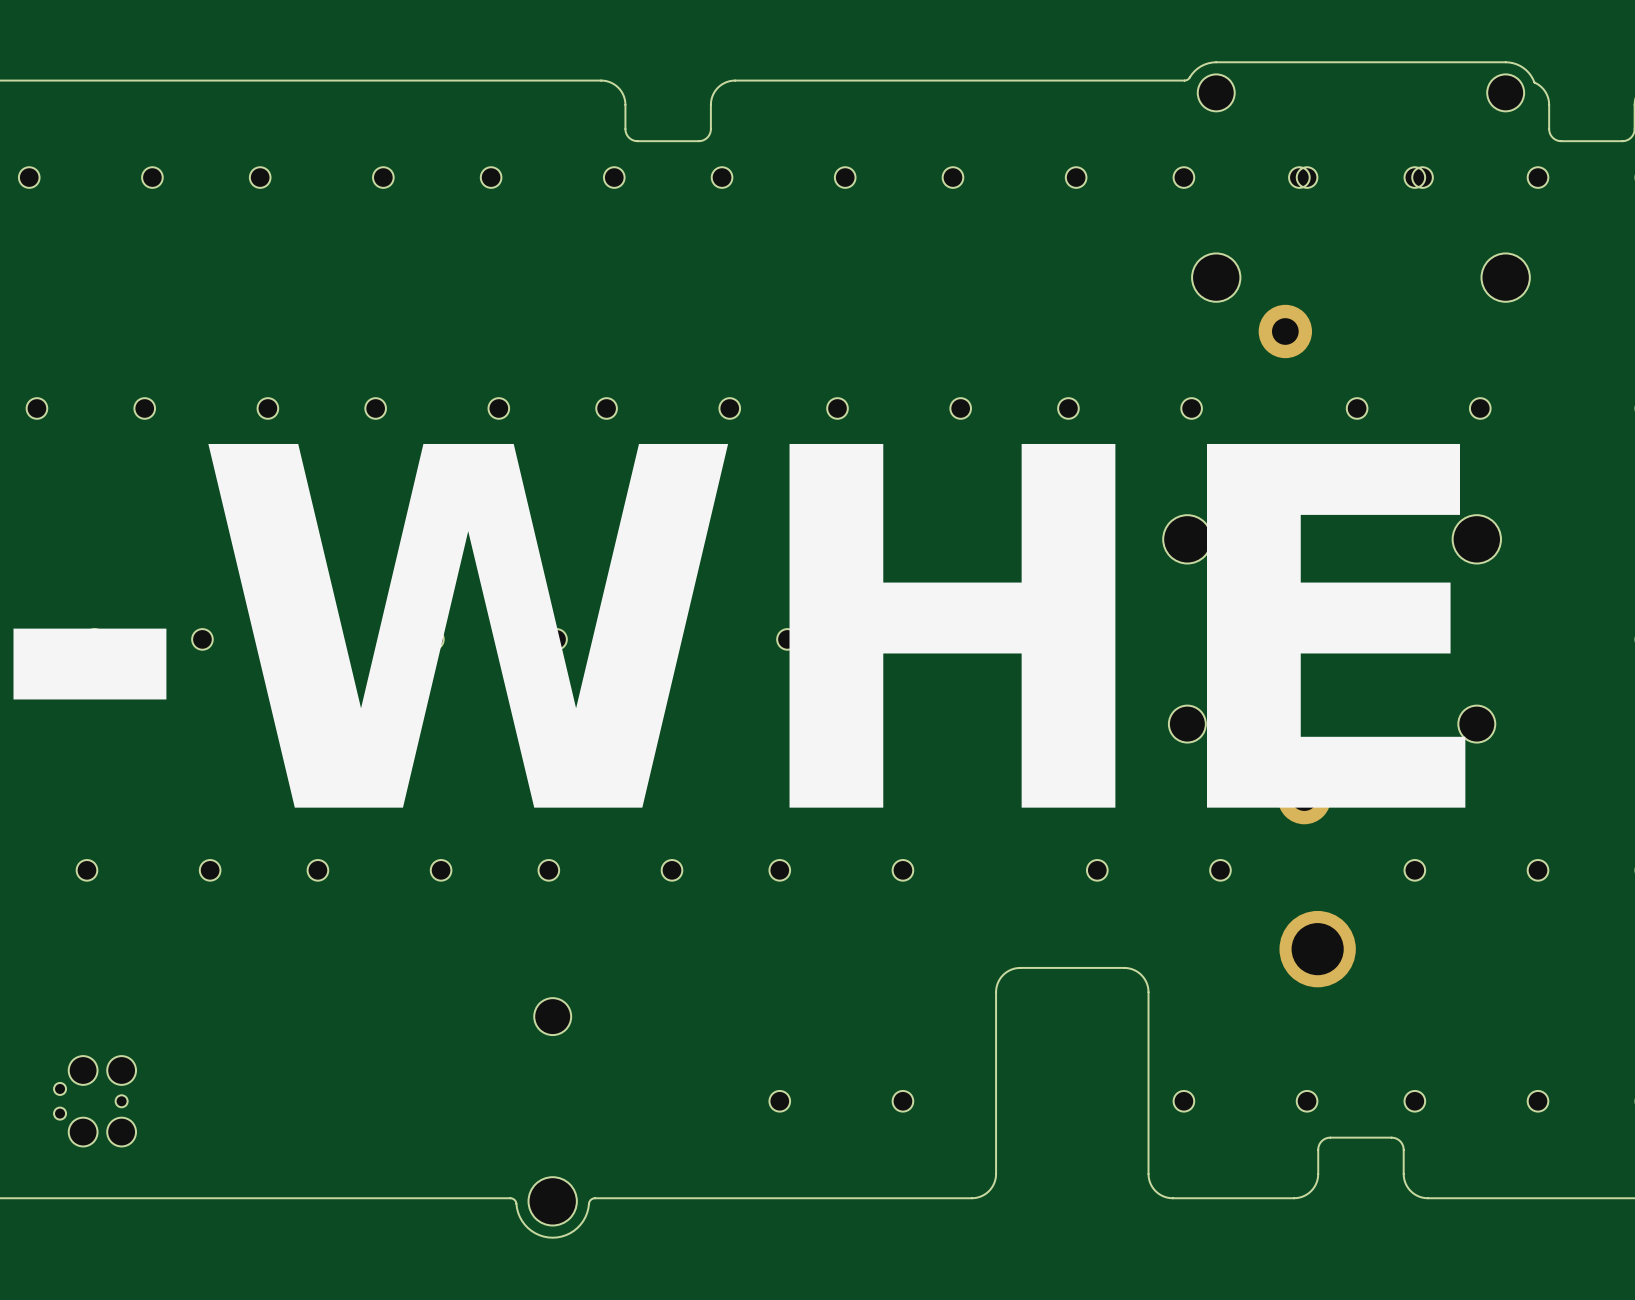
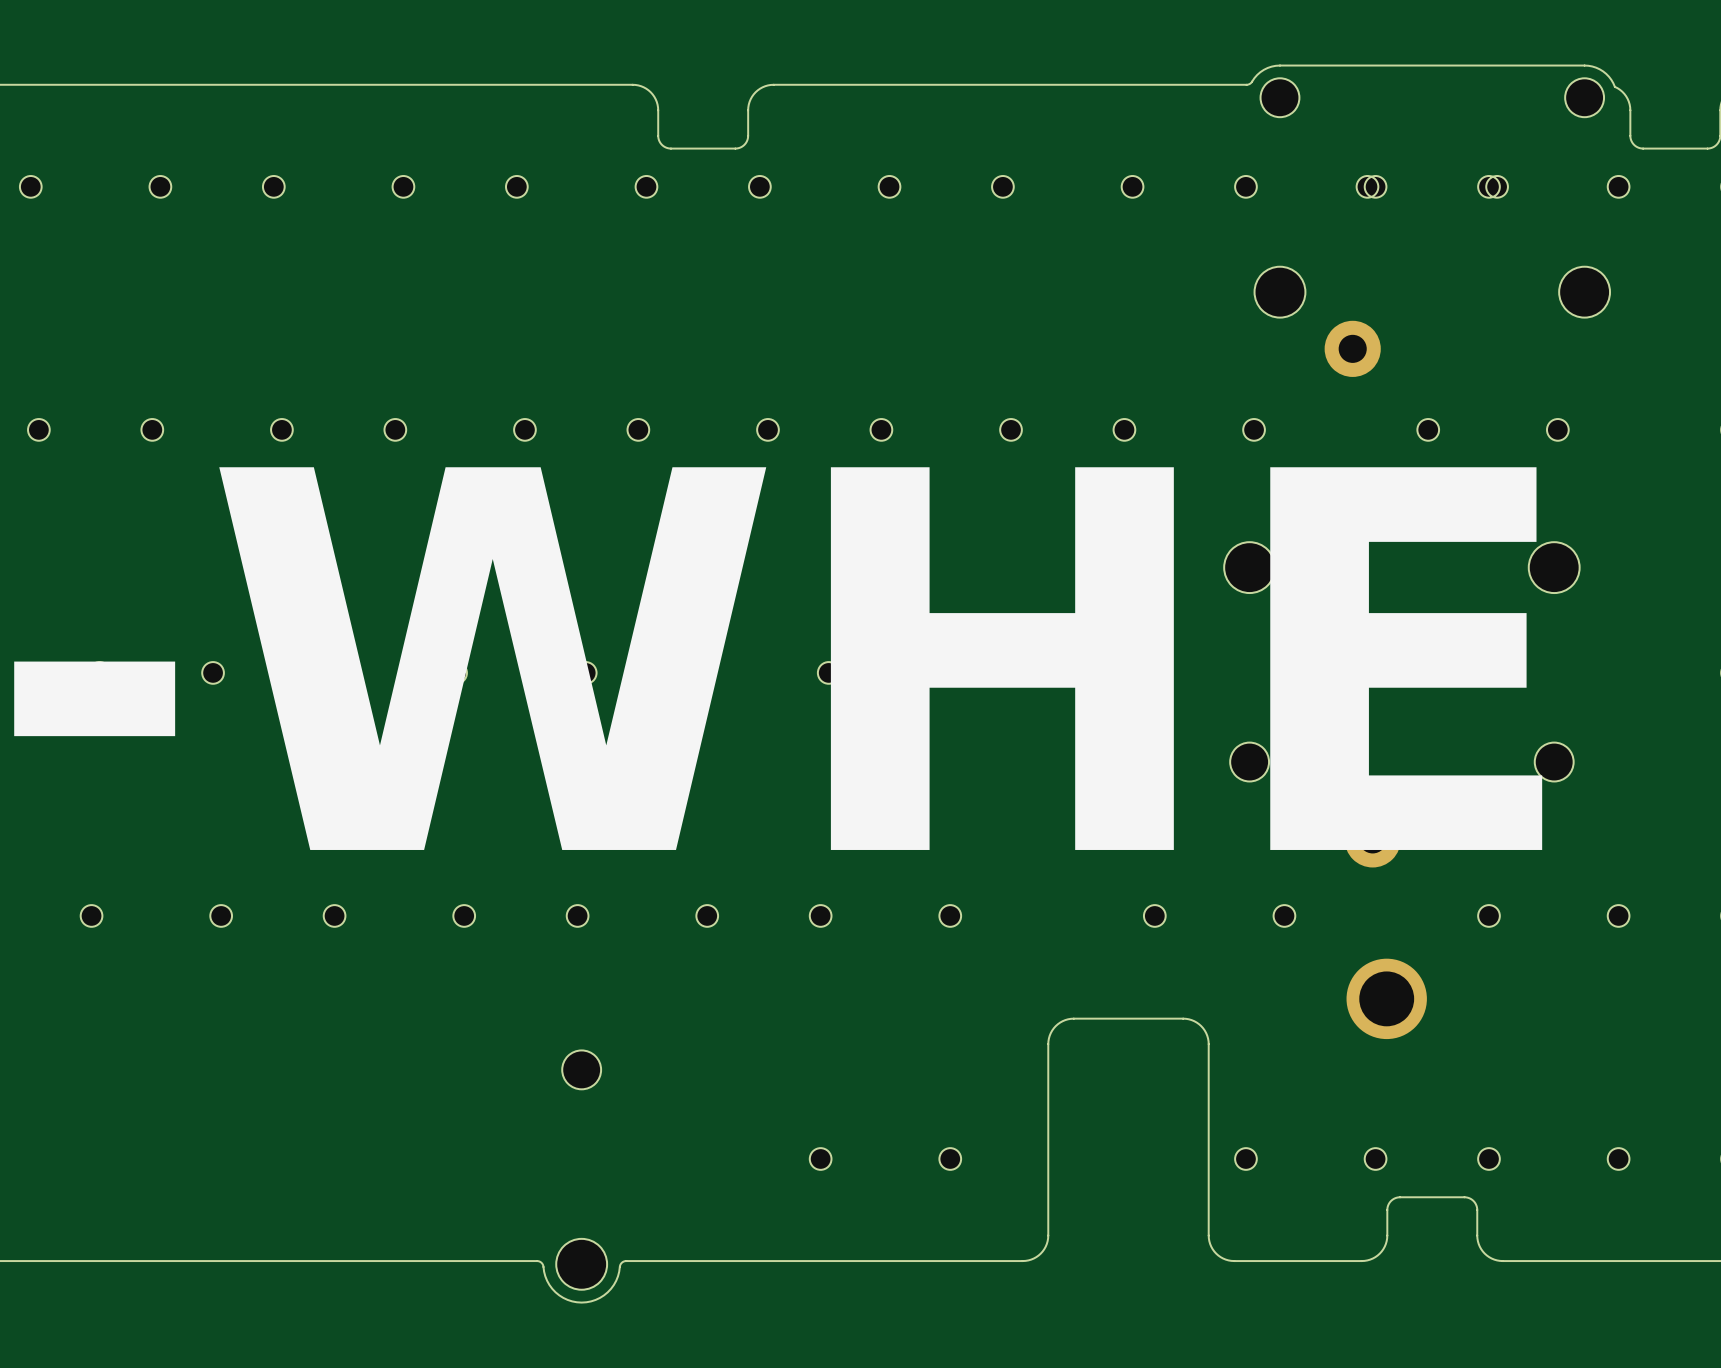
part: (95, 1101) -> none

